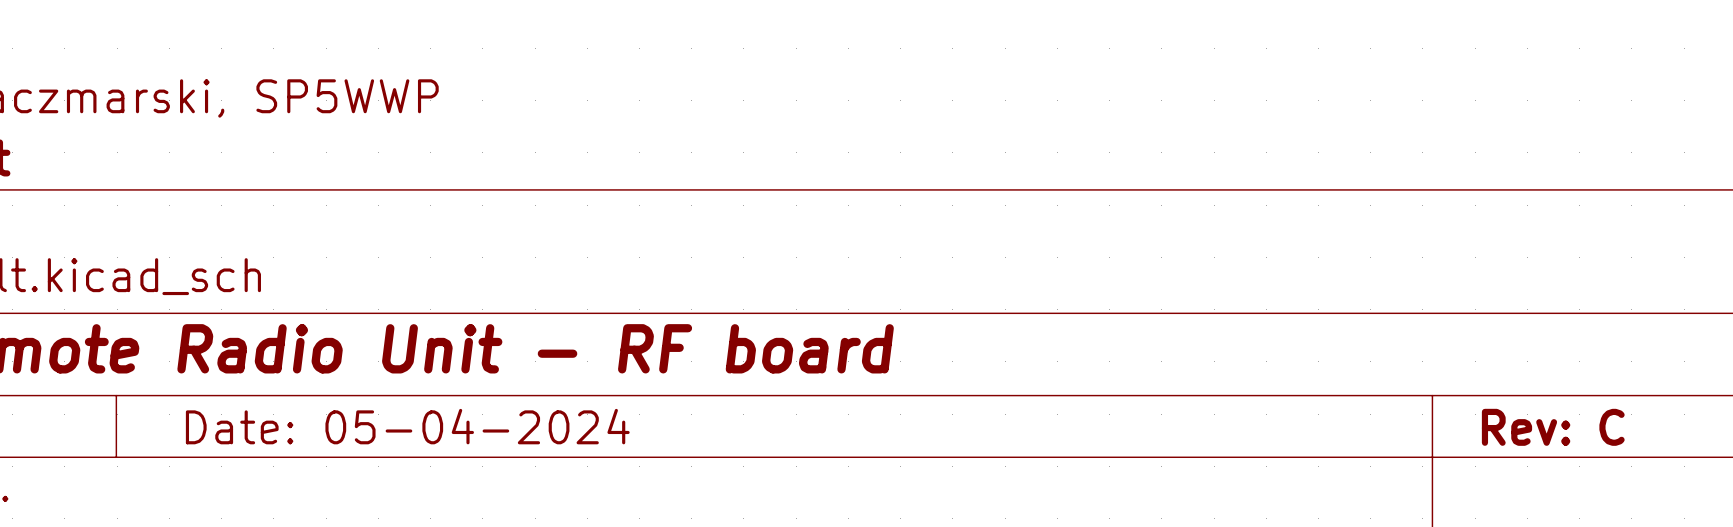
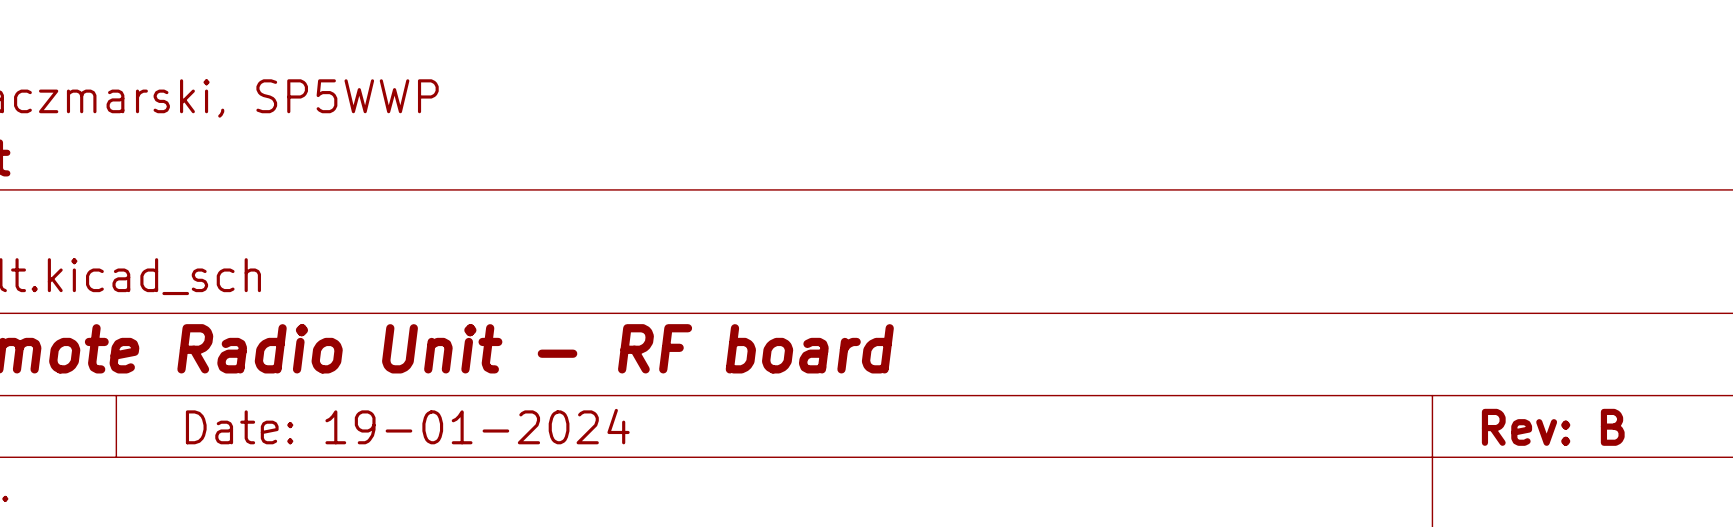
title block: Date: 05-04-2024 (407, 426) -> Date: 19-01-2024 (407, 426)
title block: Rev: C (1553, 427) -> Rev: B (1553, 427)

